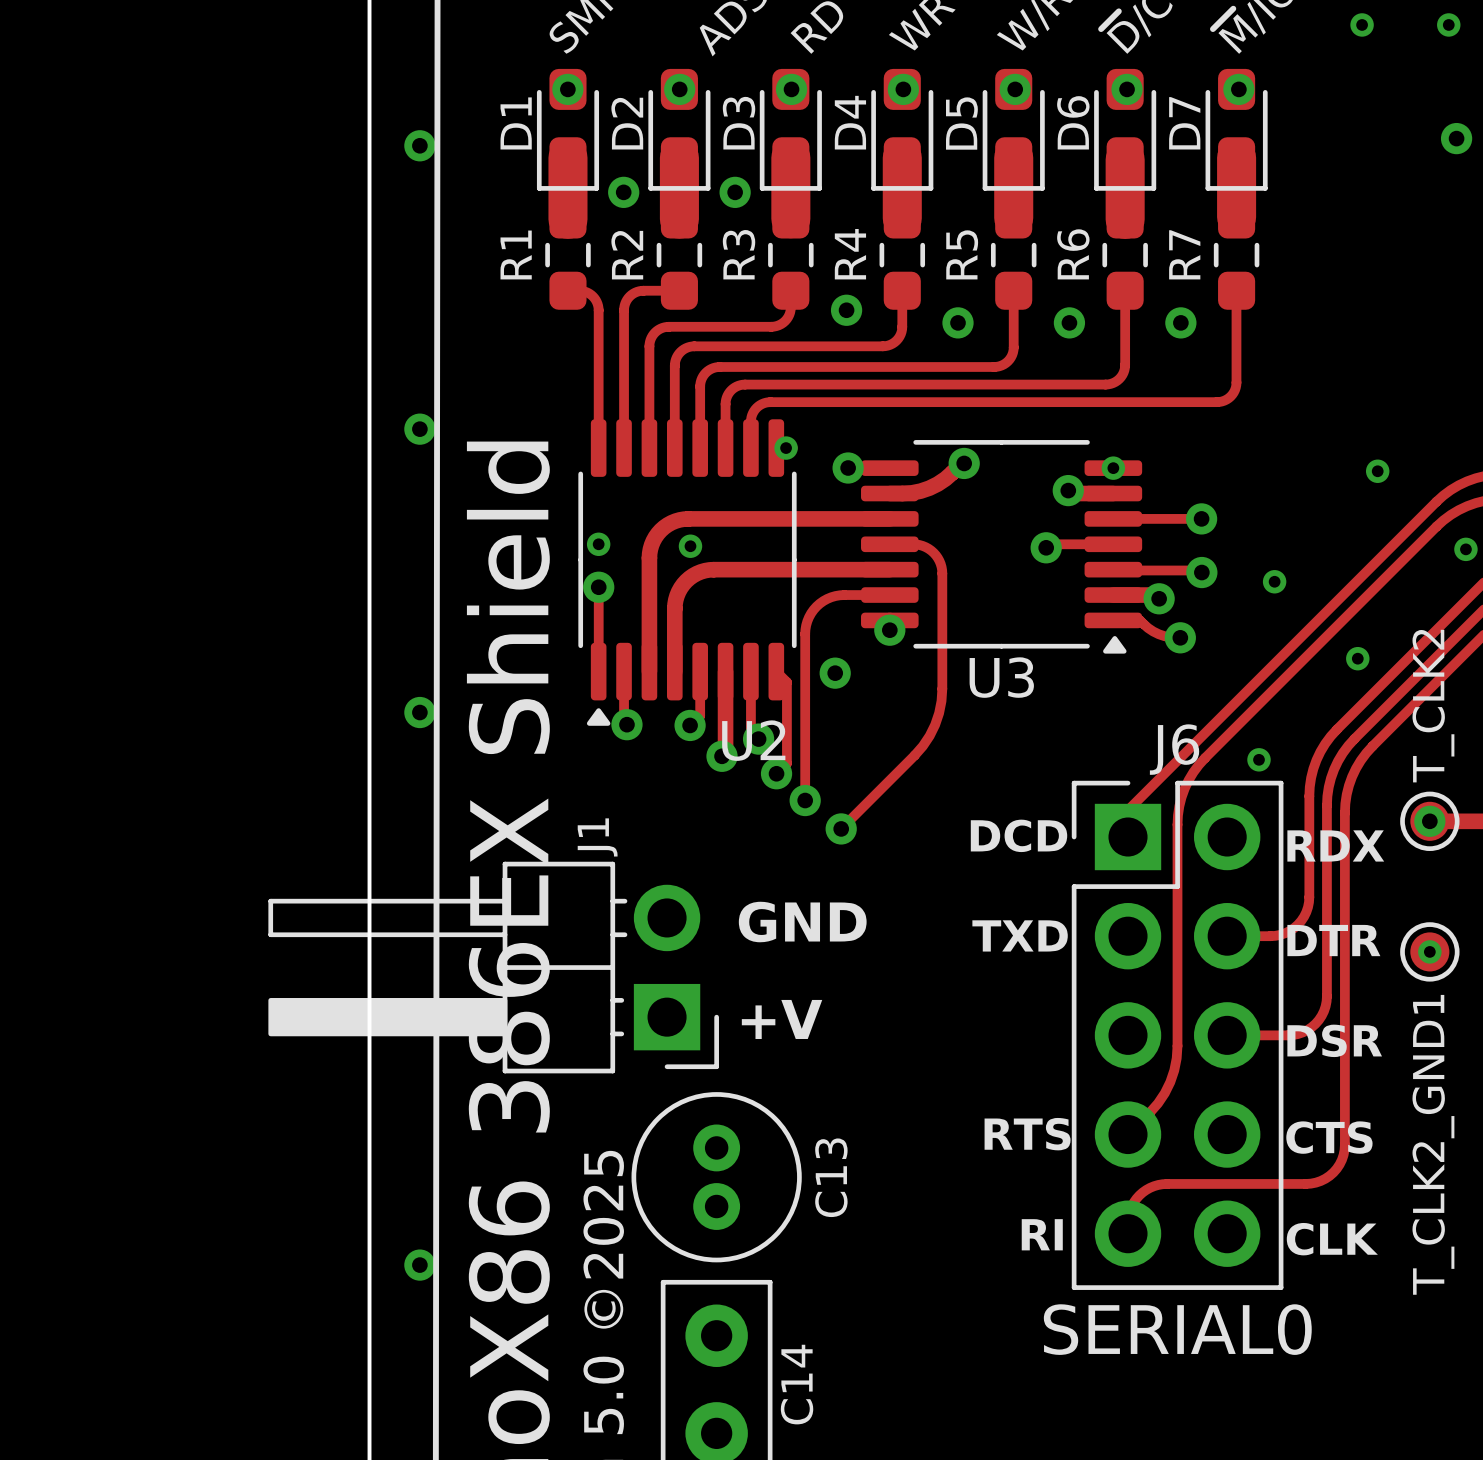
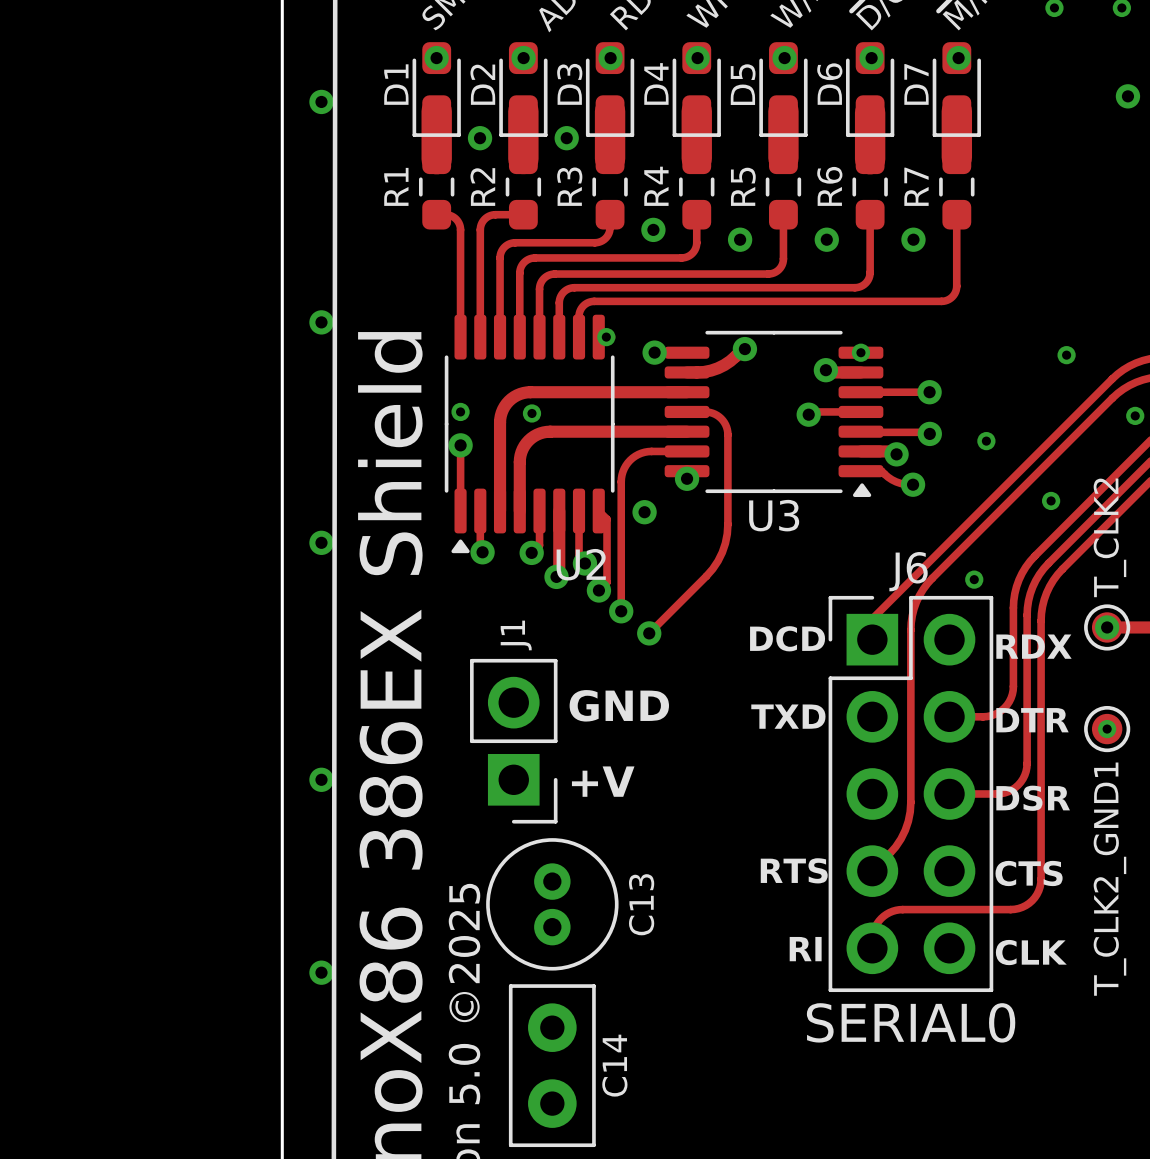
J1 name position: J1 (597, 837) -> J1 (516, 635)
J1 footprint: [268, 861, 719, 1074] -> [470, 658, 558, 824]

